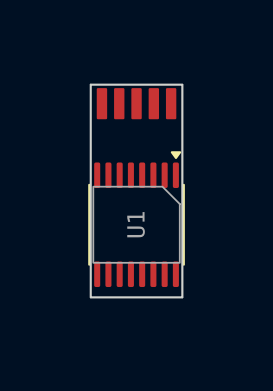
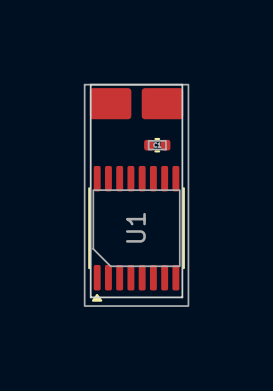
part footprint: [89, 83, 184, 299] -> [83, 83, 190, 307]
part: none -> (157, 145)
U1 footprint: [88, 151, 185, 288] -> [88, 165, 185, 302]

